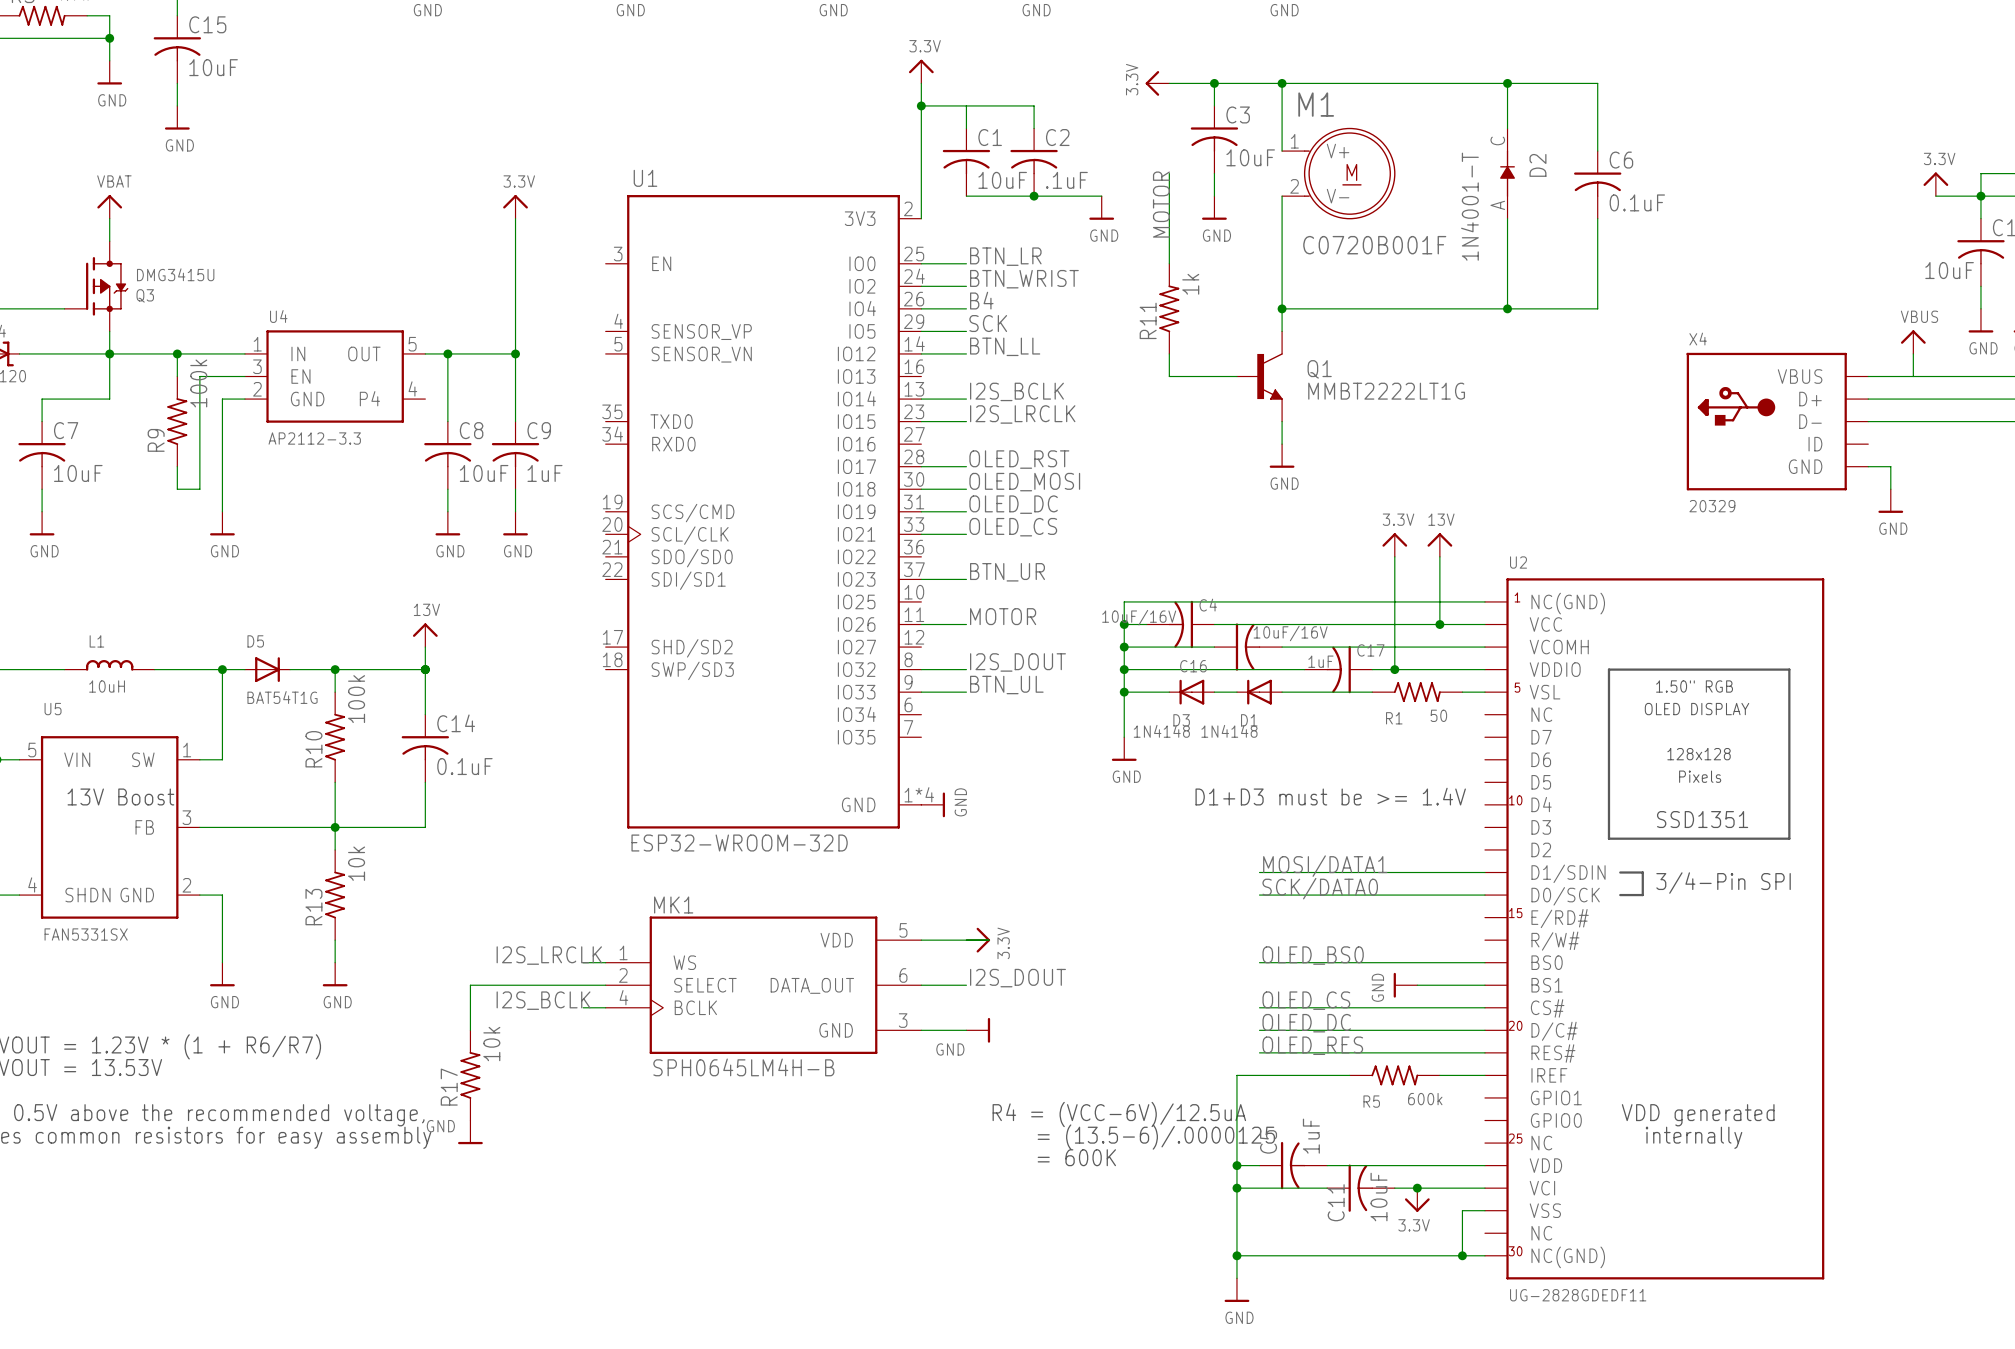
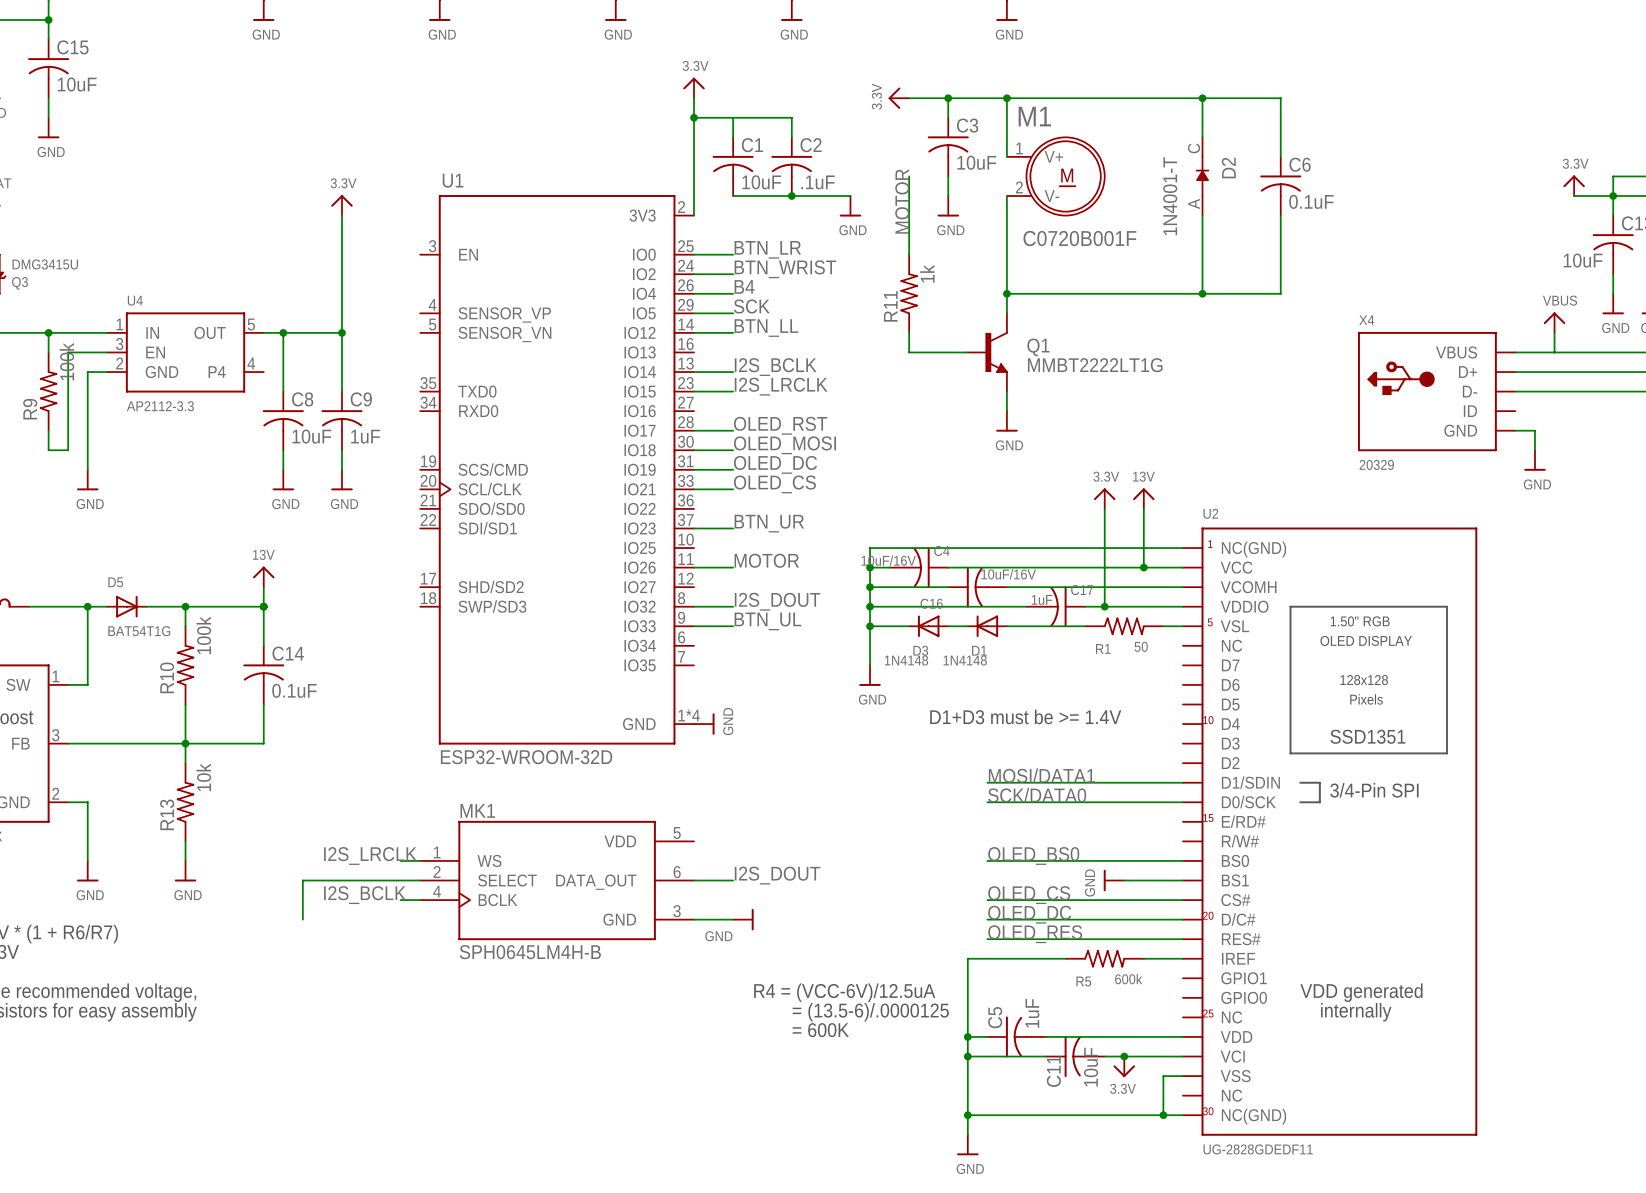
wire: (921, 940) (988, 940) -> none
power symbol: 3.3V (978, 940) -> none
R17: 10k (470, 1075) -> none
power symbol: GND (470, 1132) -> none

